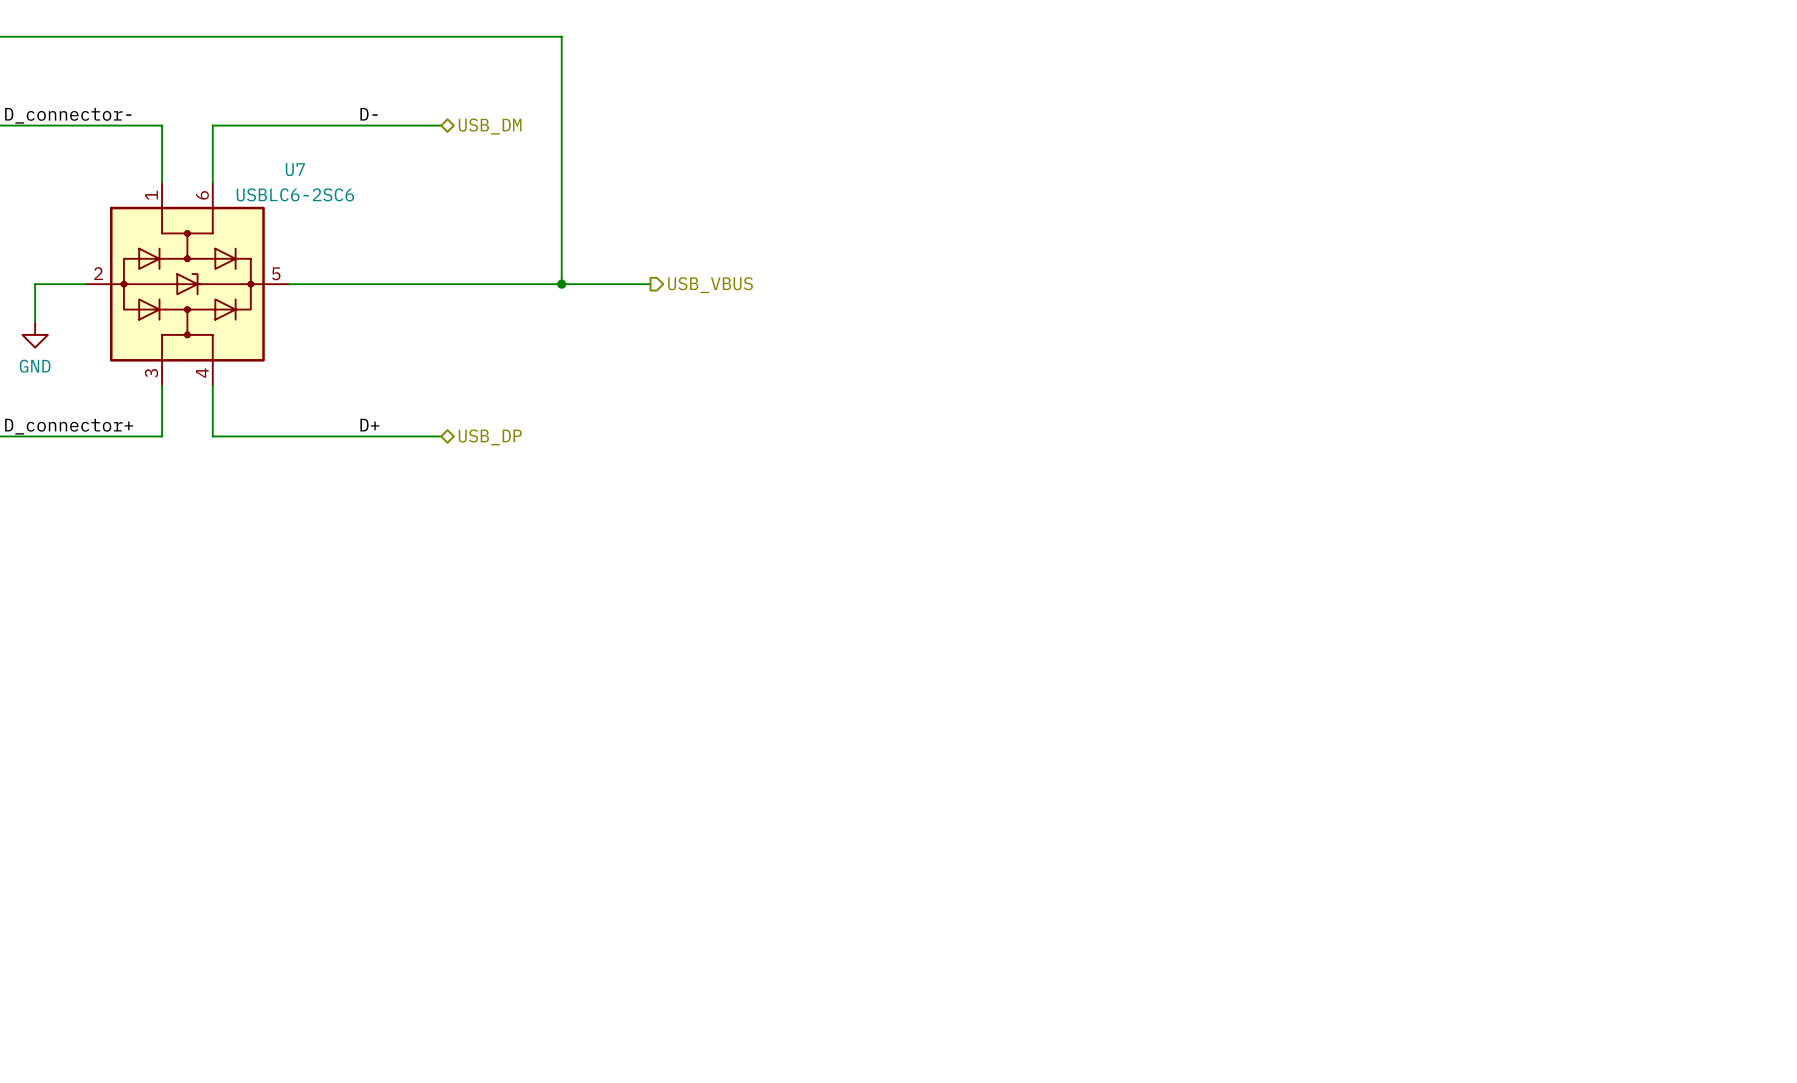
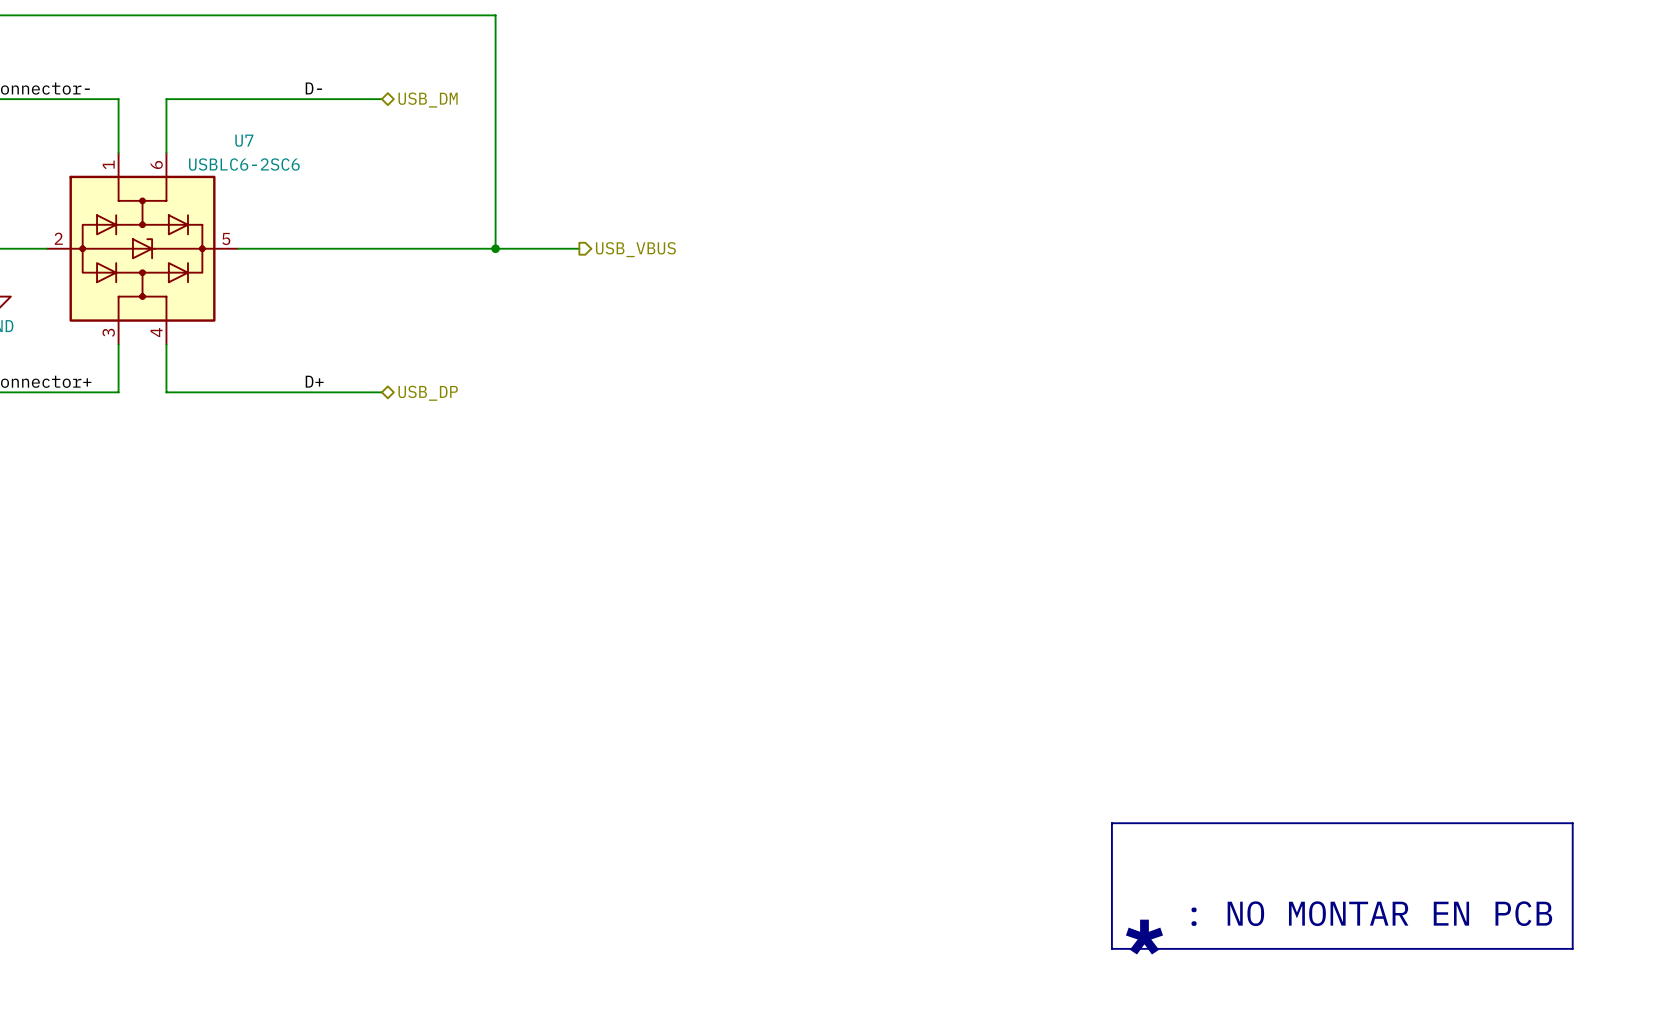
line: none -> (1111, 823) (1111, 948) (1572, 948) (1572, 823) (1111, 823)
text: none -> : NO MONTAR EN PCB (1371, 913)
text: none -> * (1144, 937)

